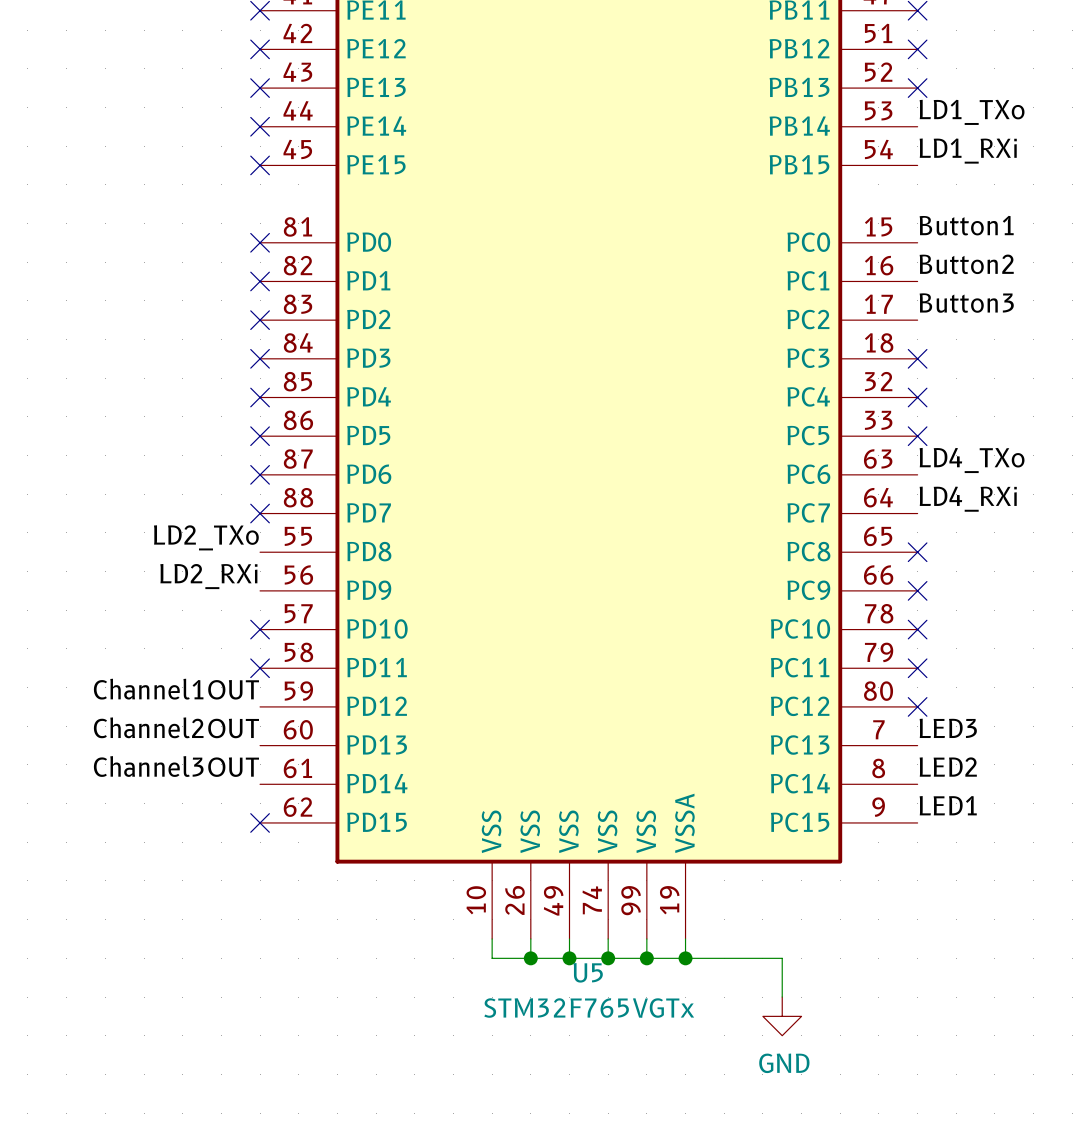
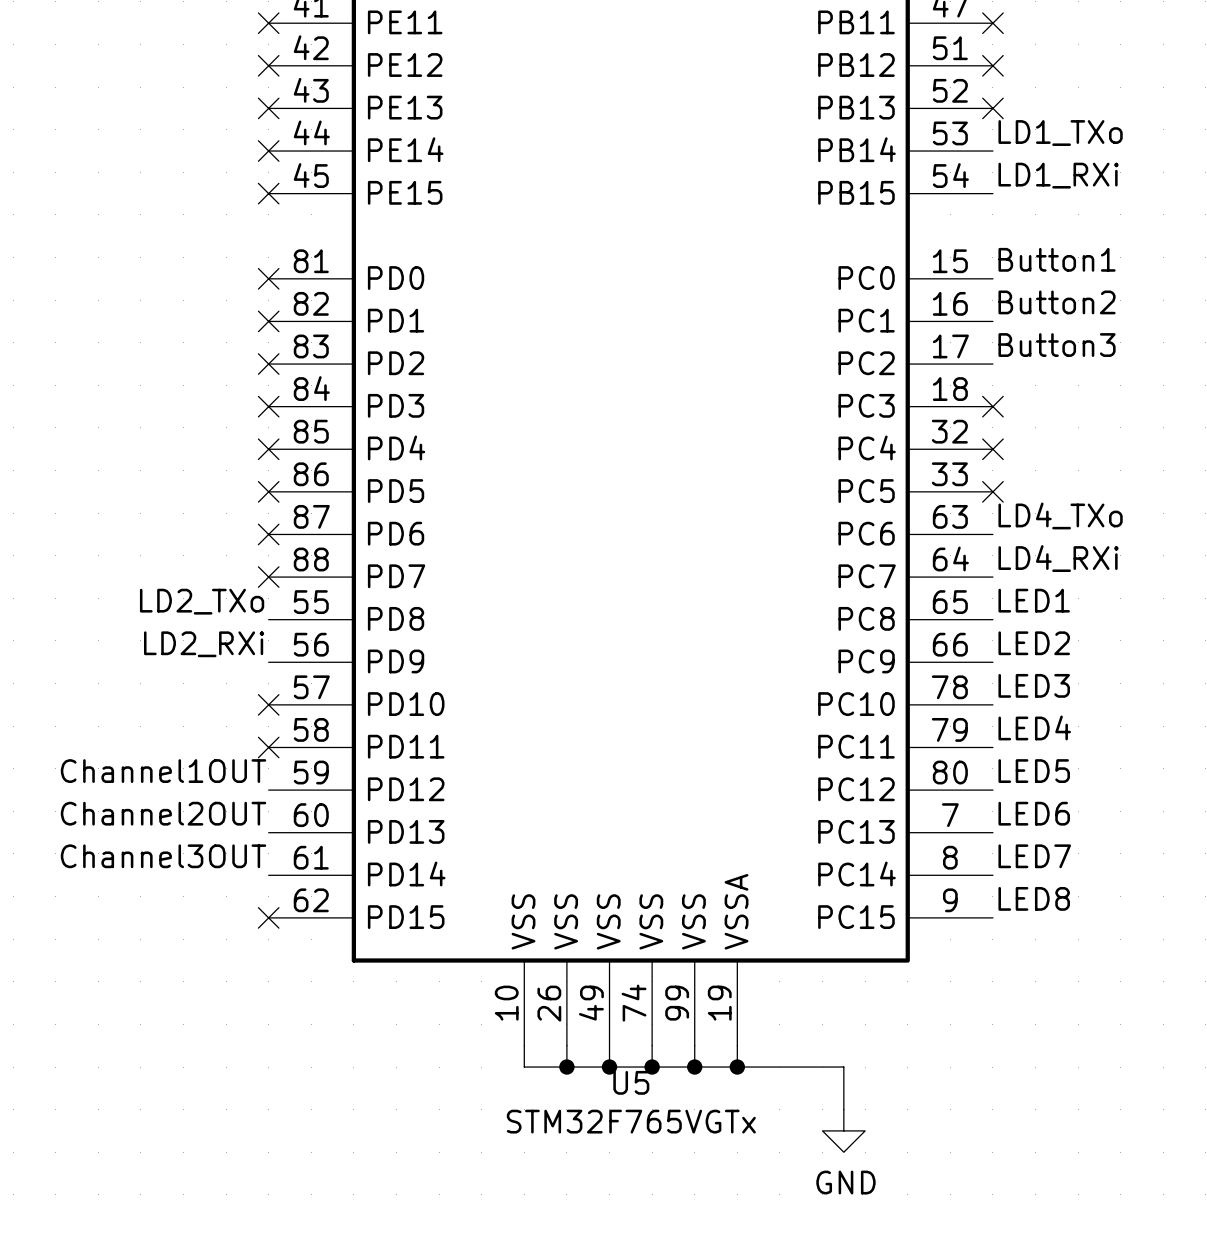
label: none -> LED1 (1034, 600)
no-connect mark: (917, 552) -> none
label: none -> LED2 (1034, 643)
no-connect mark: (917, 590) -> none
label: none -> LED3 (1034, 685)
no-connect mark: (917, 629) -> none
label: none -> LED4 (1034, 727)
no-connect mark: (917, 668) -> none
label: none -> LED5 (1034, 771)
no-connect mark: (917, 706) -> none
label: LED3 (948, 728) -> LED6 (1034, 813)
label: LED2 (948, 767) -> LED7 (1034, 856)
label: LED1 (948, 805) -> LED8 (1034, 898)

